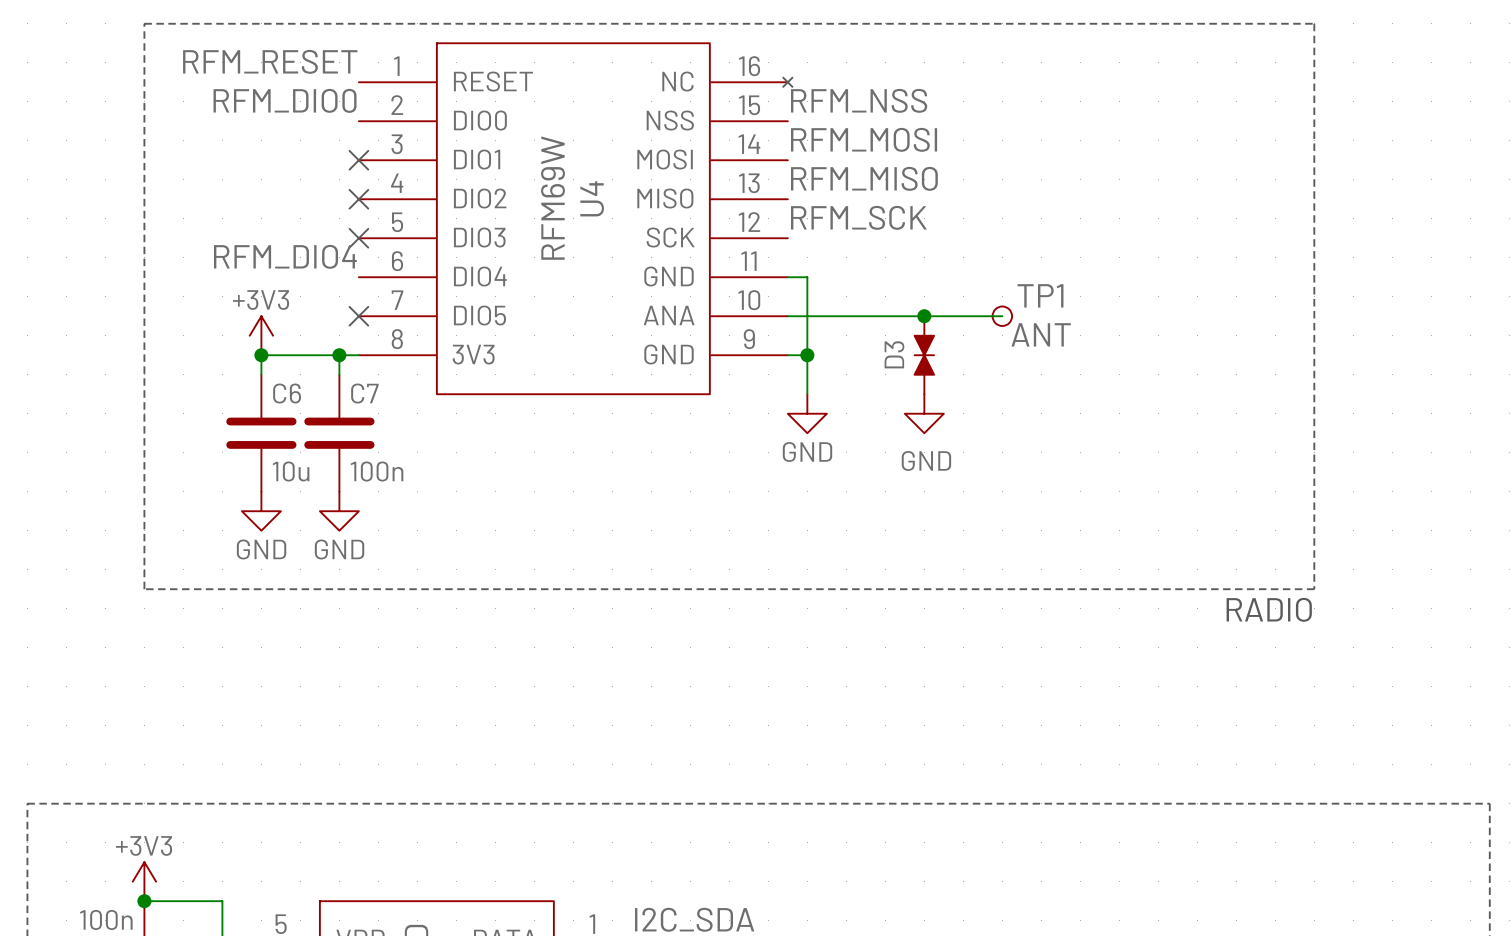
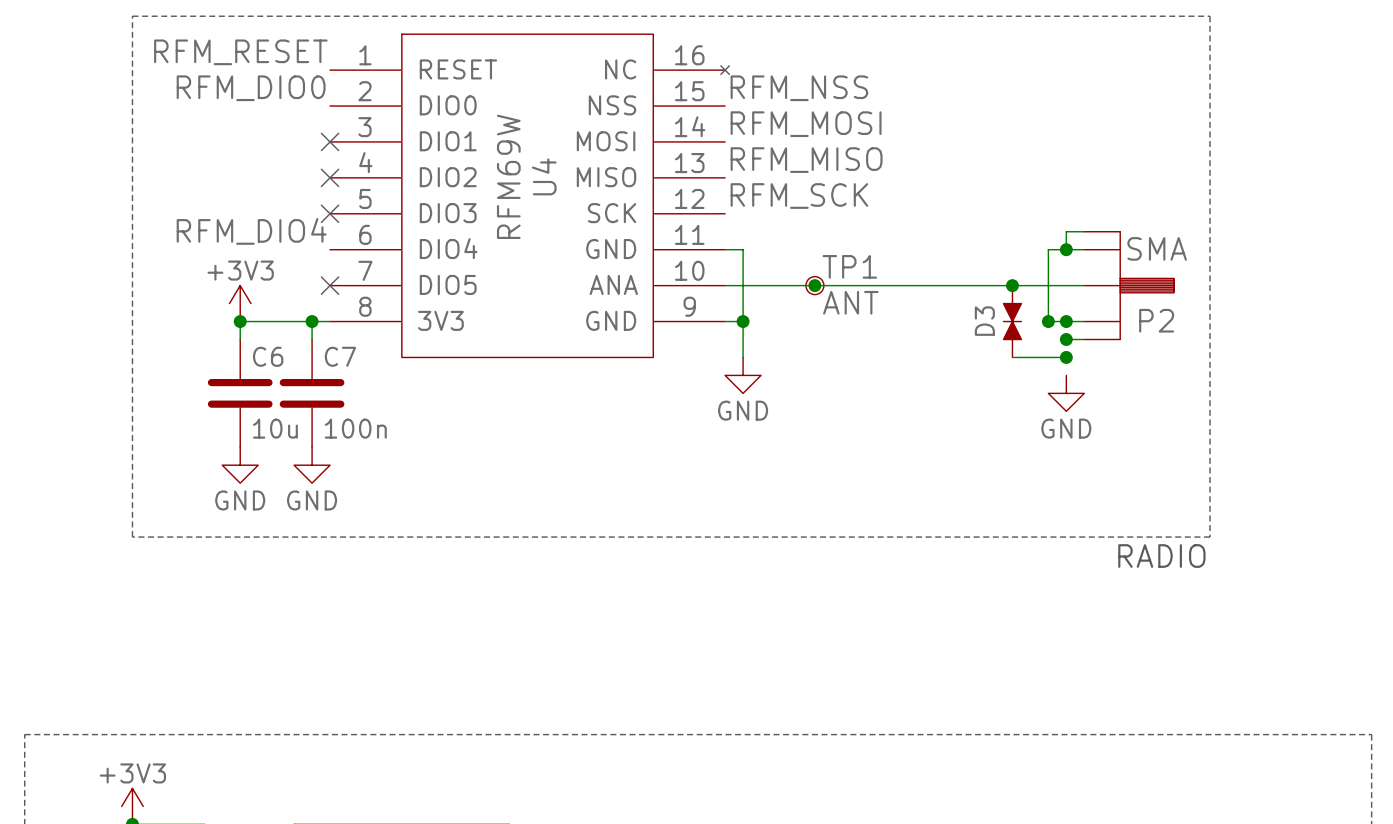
wire: none -> (1084, 231) (1066, 231) (1066, 249)
junction: none -> (1066, 249)
wire: none -> (1084, 249) (1048, 249) (1048, 321) (1084, 321)
junction position: (924, 316) -> (814, 285)
wire: none -> (922, 285) (1084, 285)
TP1 position: (1002, 316) -> (814, 285)
junction: none -> (1012, 285)
P2: none -> SMA (1129, 285)
D3 position: (924, 355) -> (1012, 321)
junction: none -> (1048, 321)
junction: none -> (1066, 321)
wire: none -> (1066, 339) (1084, 339)
junction: none -> (1066, 339)
wire: none -> (1012, 357) (1066, 357)
junction: none -> (1066, 357)
power symbol position: GND (924, 413) -> GND (1066, 393)
power symbol text position: GND (926, 460) -> GND (1066, 428)

